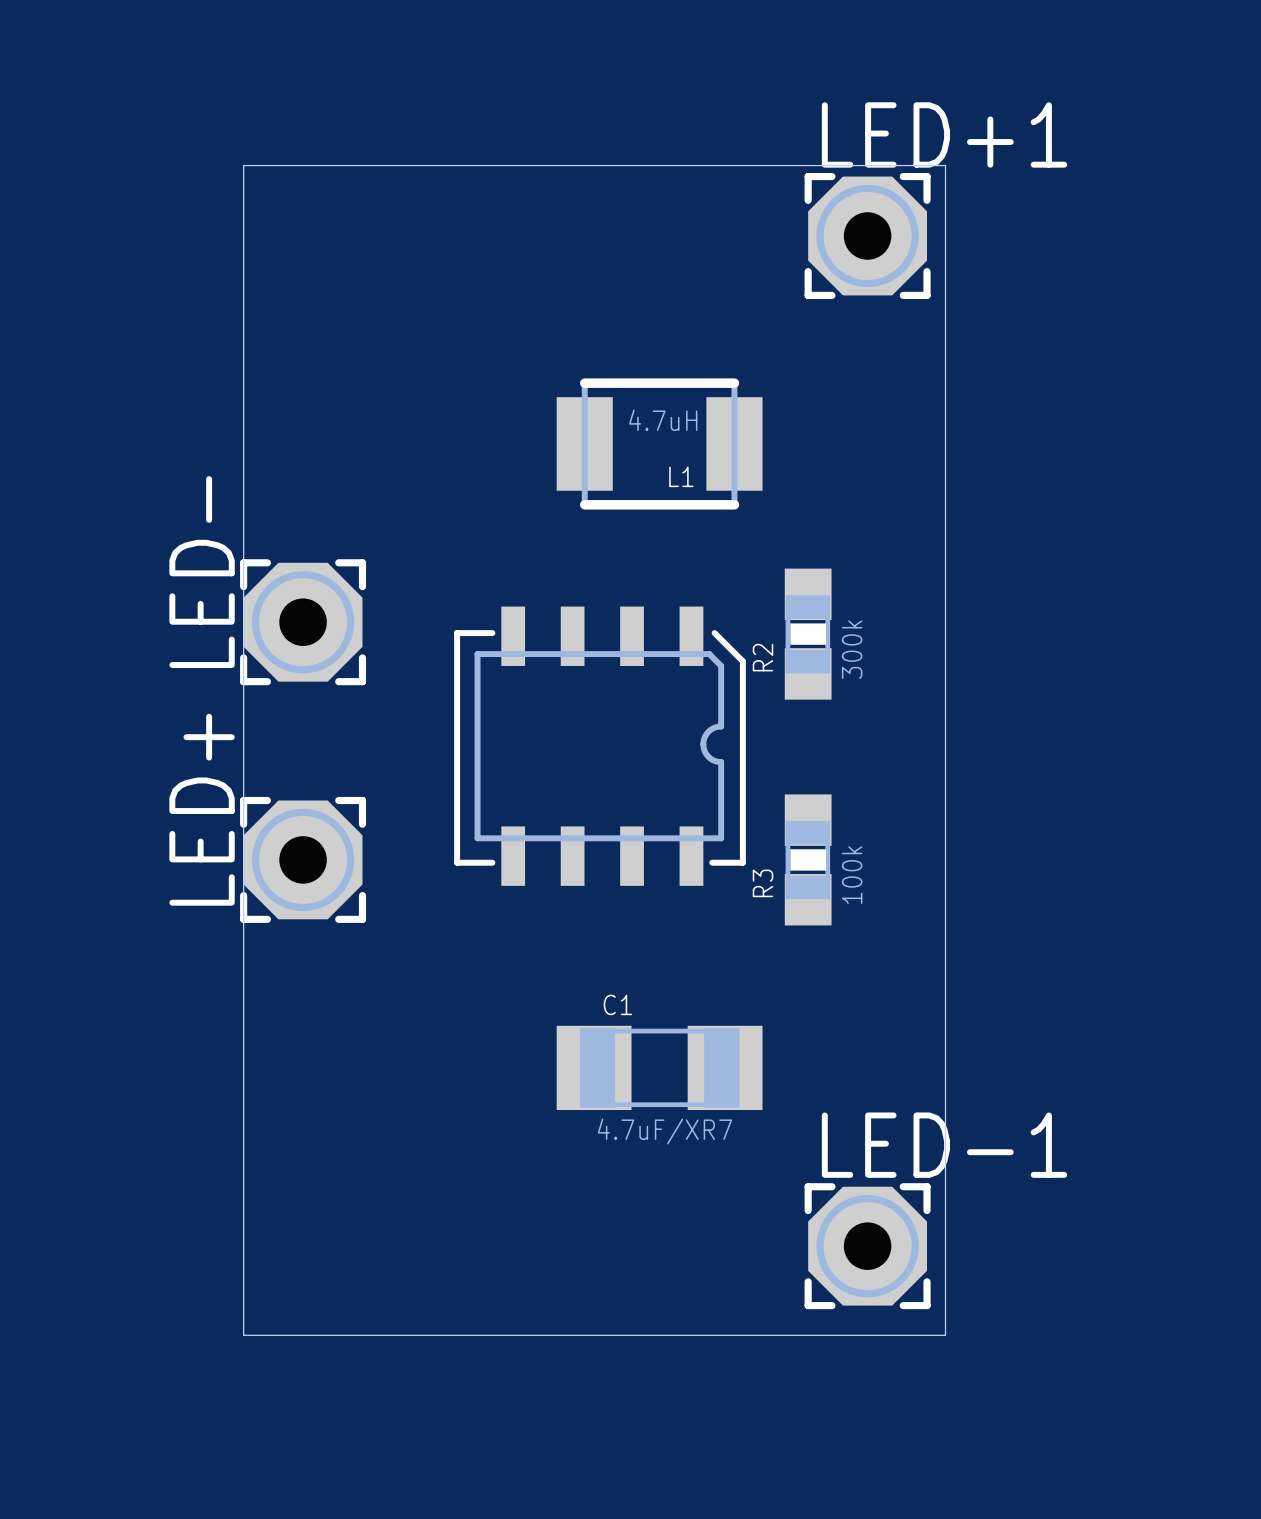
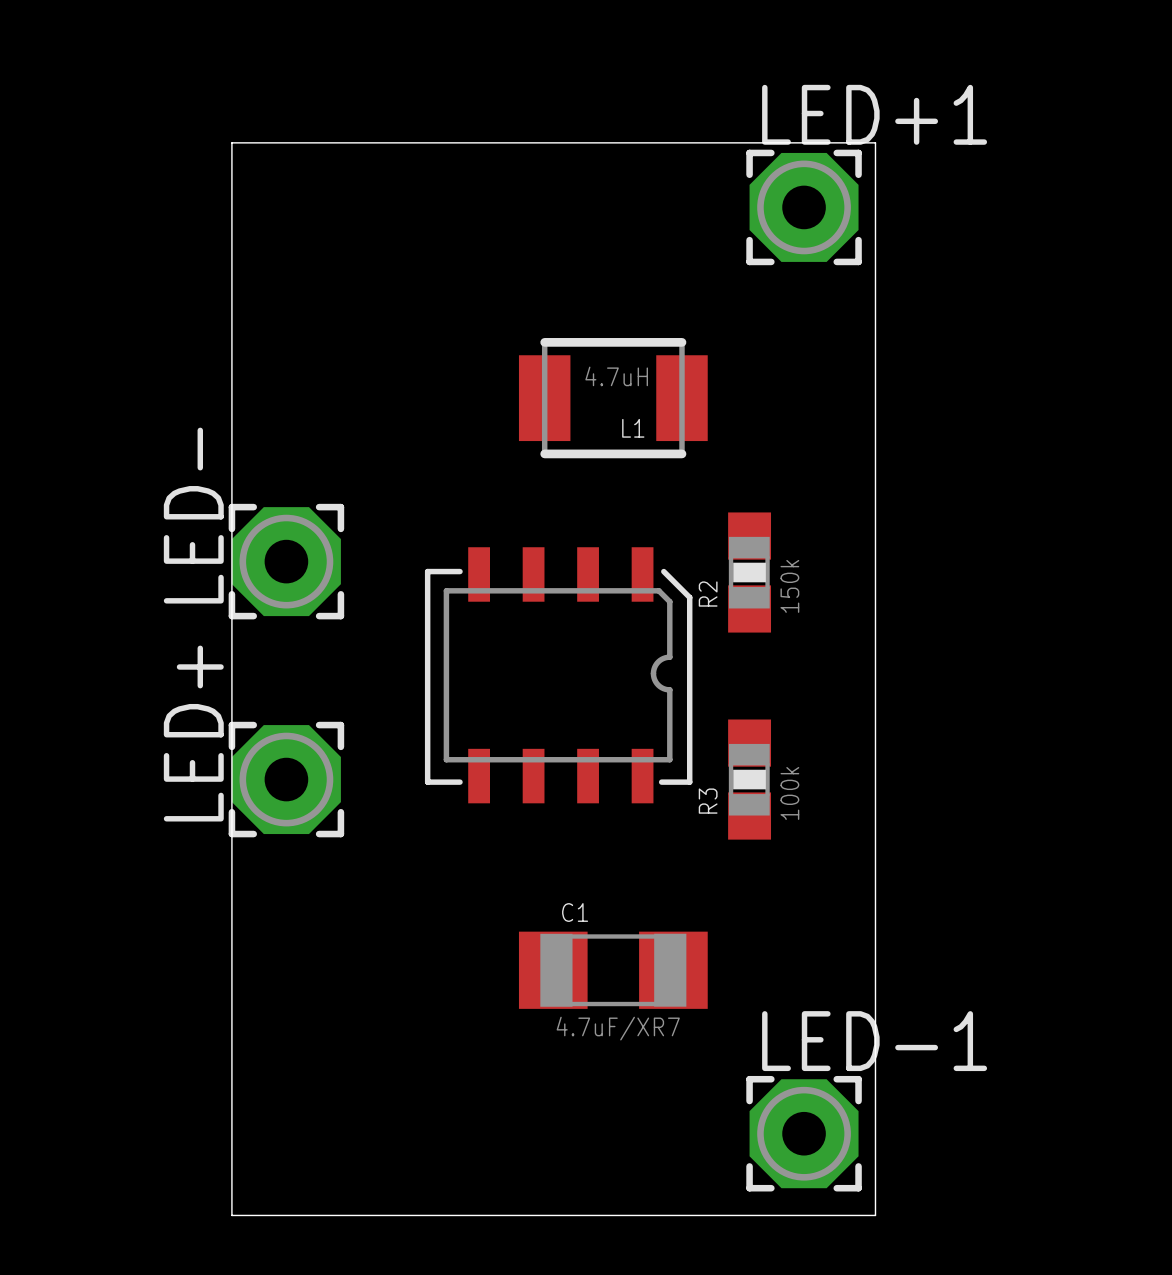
R2 value: 300k (852, 649) -> 150k (789, 586)

